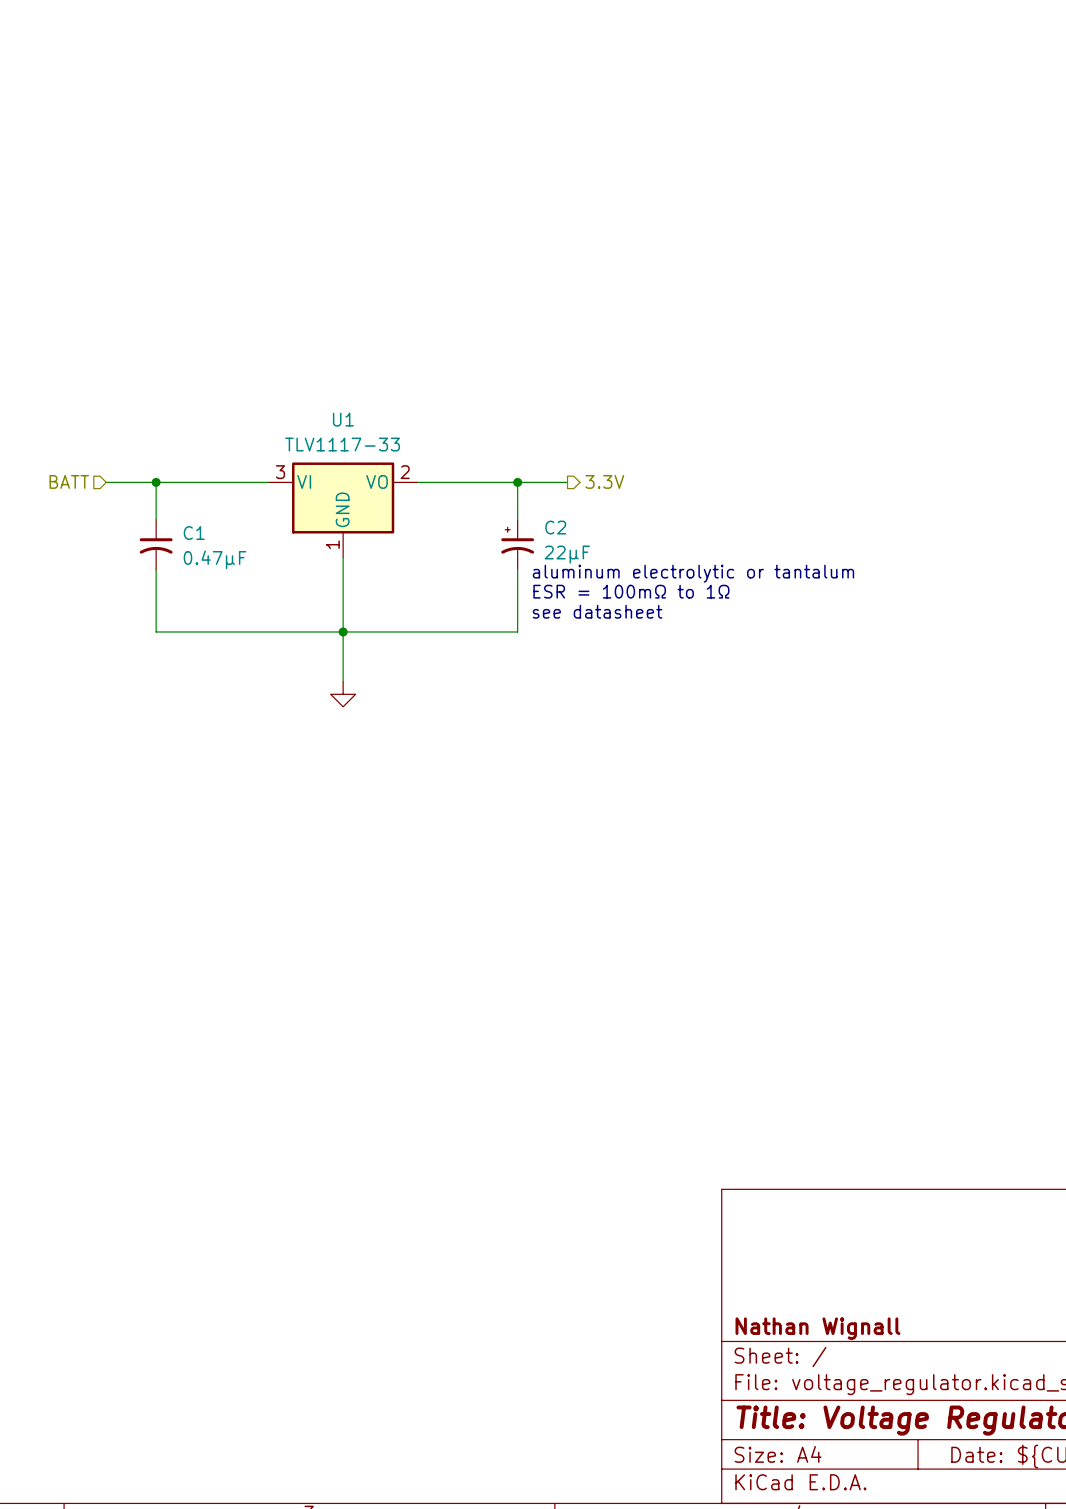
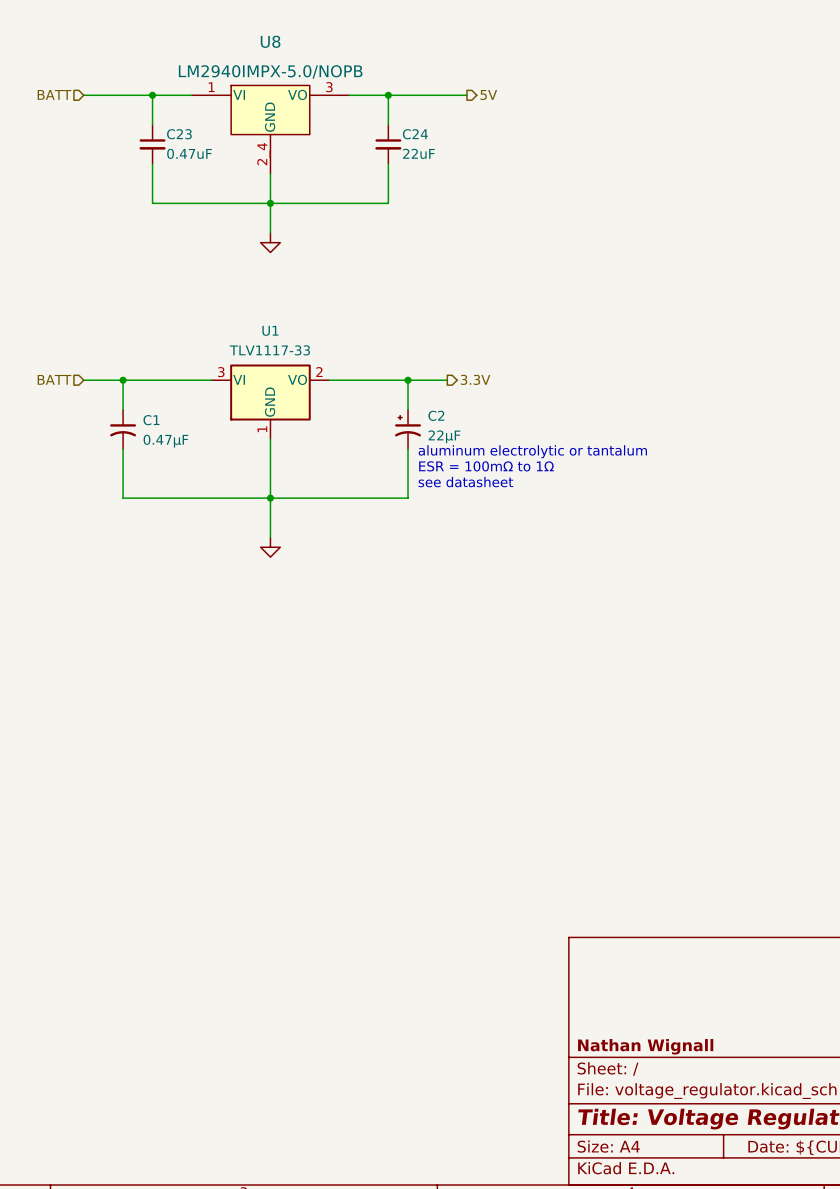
hierarchical label: none -> BATT (54, 94)
wire: none -> (83, 95) (191, 95)
wire: none -> (152, 95) (152, 124)
junction: none -> (152, 95)
wire: none -> (349, 95) (466, 95)
wire: none -> (388, 95) (388, 124)
junction: none -> (388, 95)
hierarchical label: none -> 5V (488, 95)
U8: none -> LM2940IMPX-5.0/NOPB (270, 129)
C23: none -> 0.47uF (152, 144)
C24: none -> 22uF (388, 144)
wire: none -> (152, 164) (152, 203) (388, 203) (388, 164)
wire: none -> (270, 173) (270, 232)
junction: none -> (270, 203)
power symbol: none -> (270, 242)

